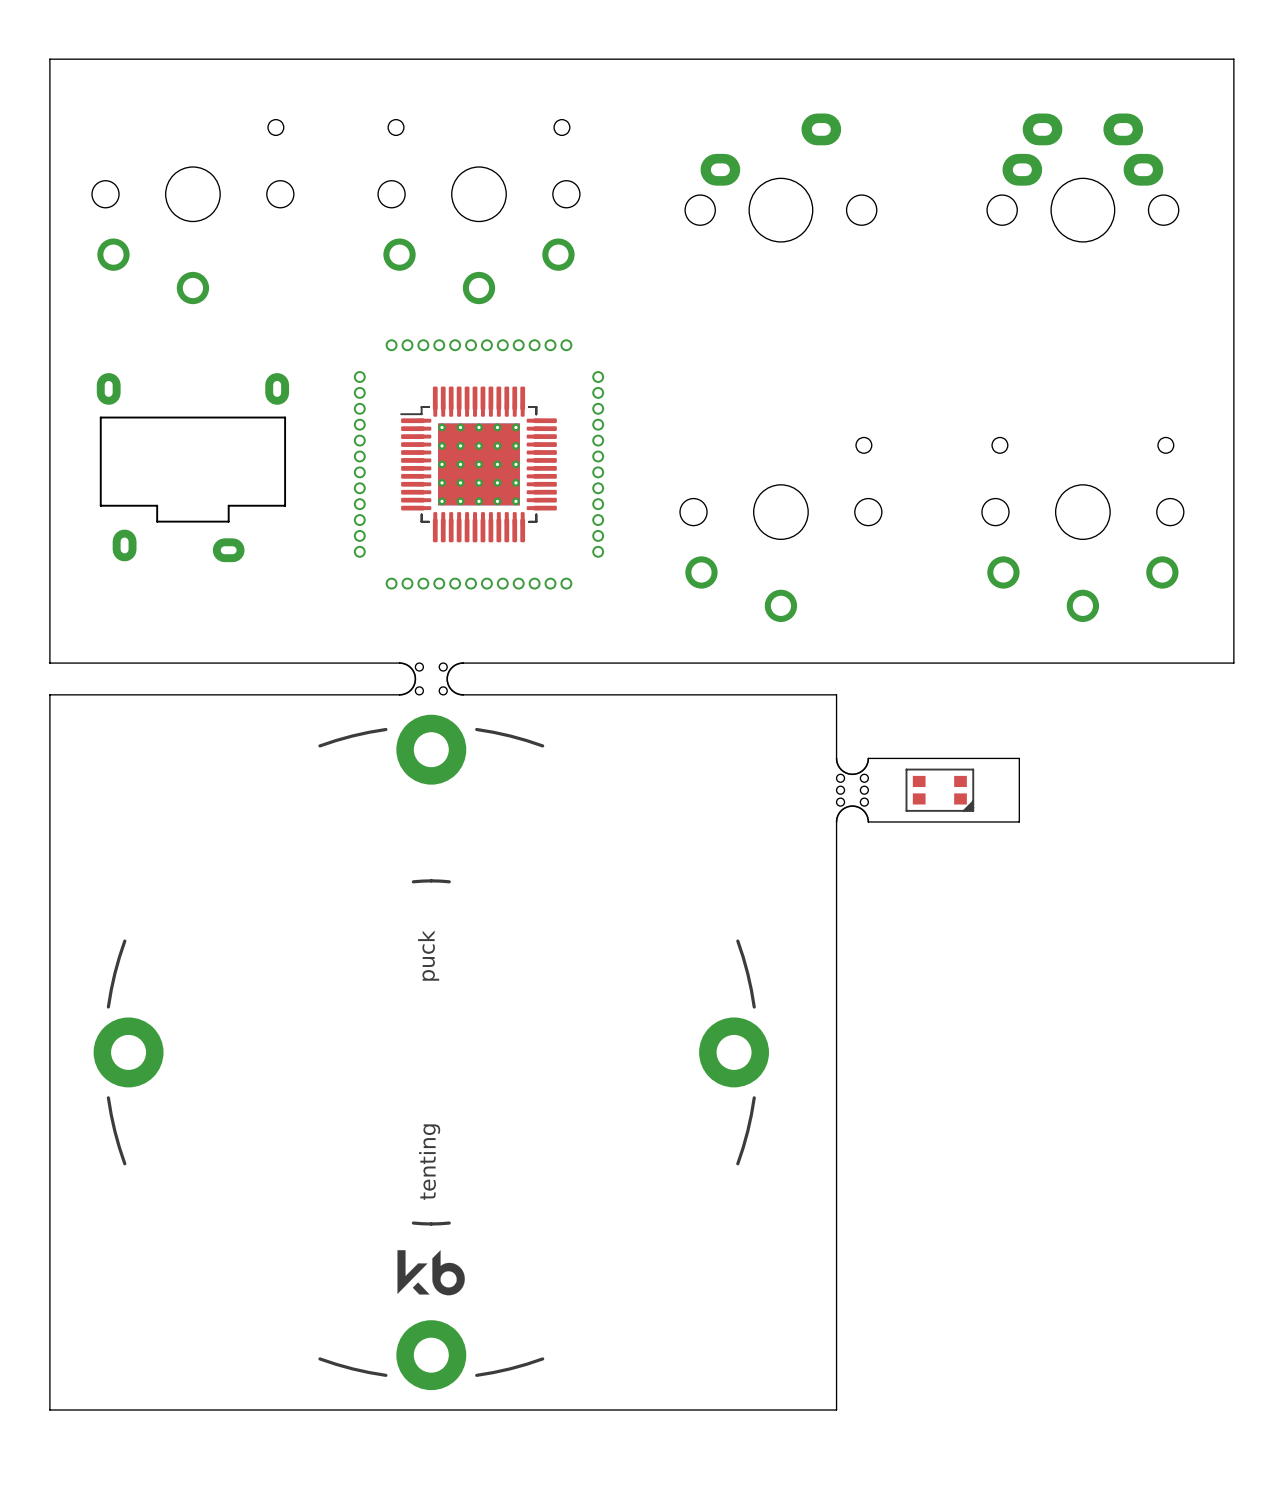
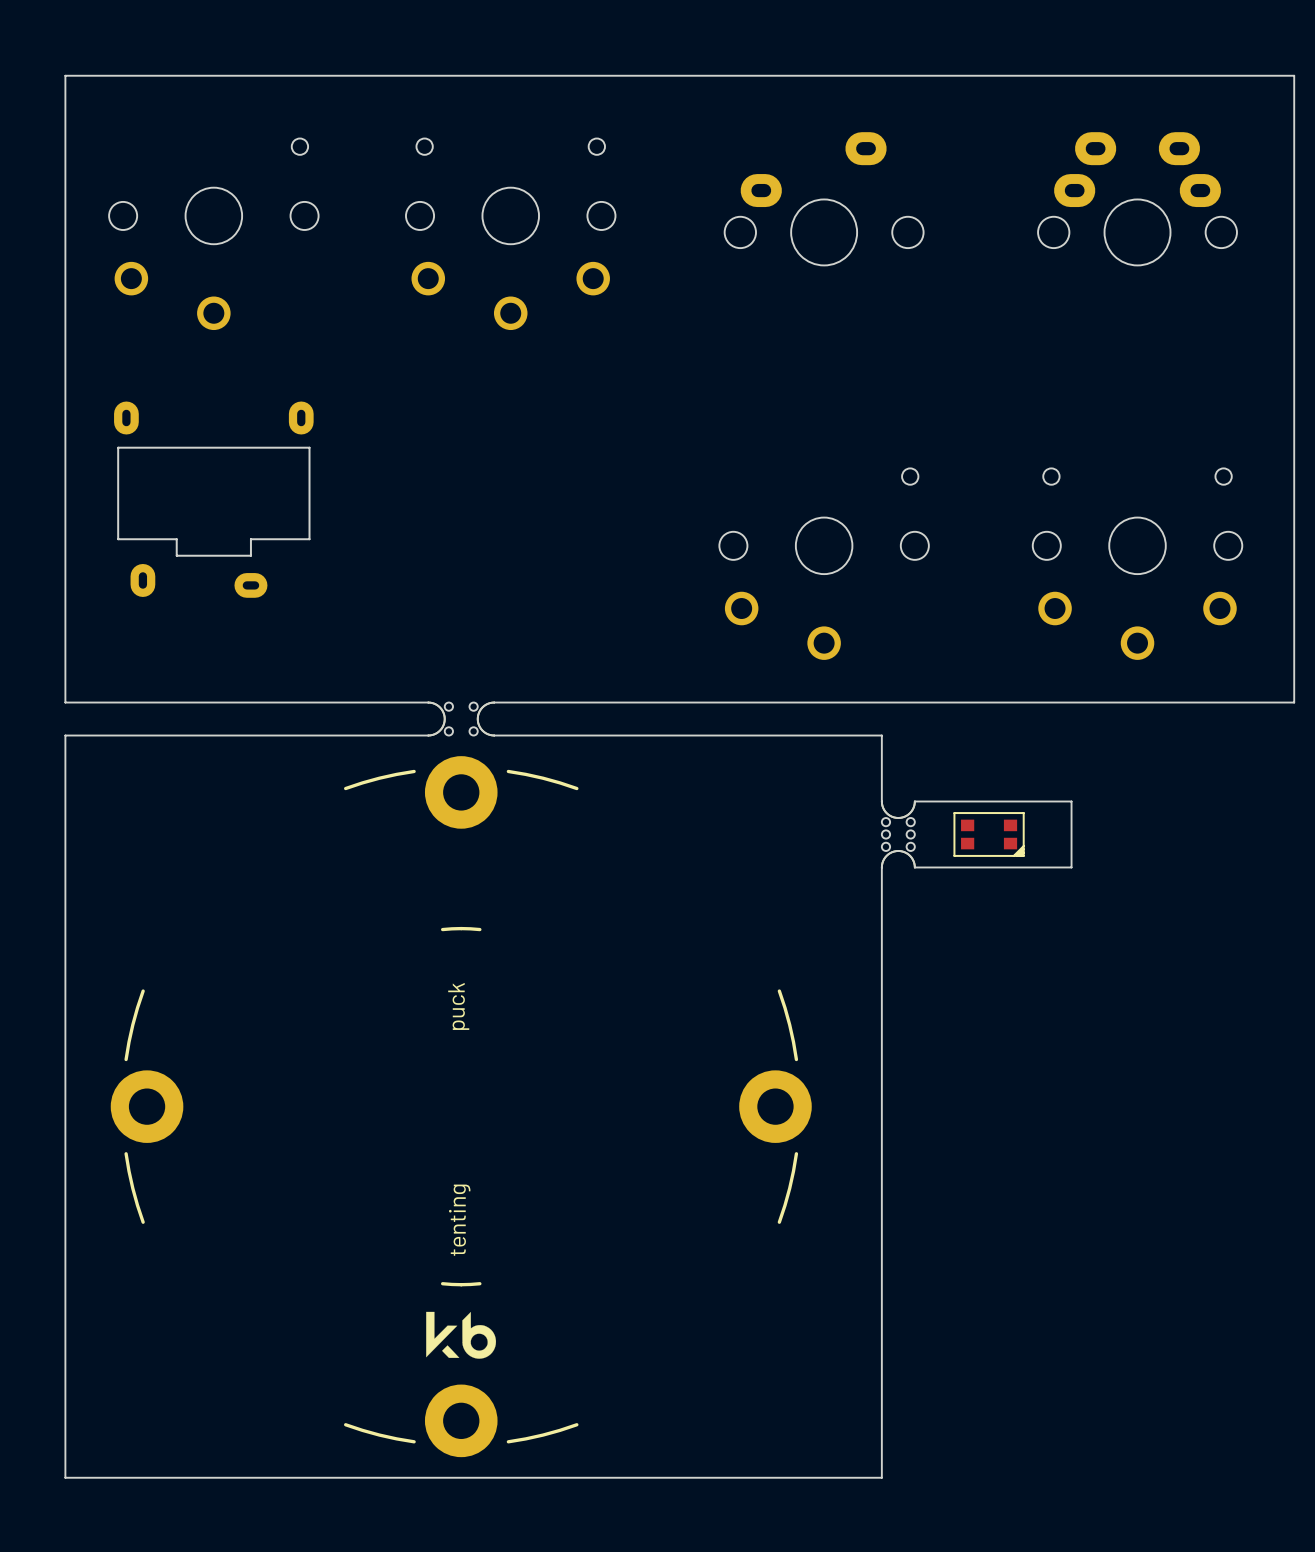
part: (478, 464) -> none

